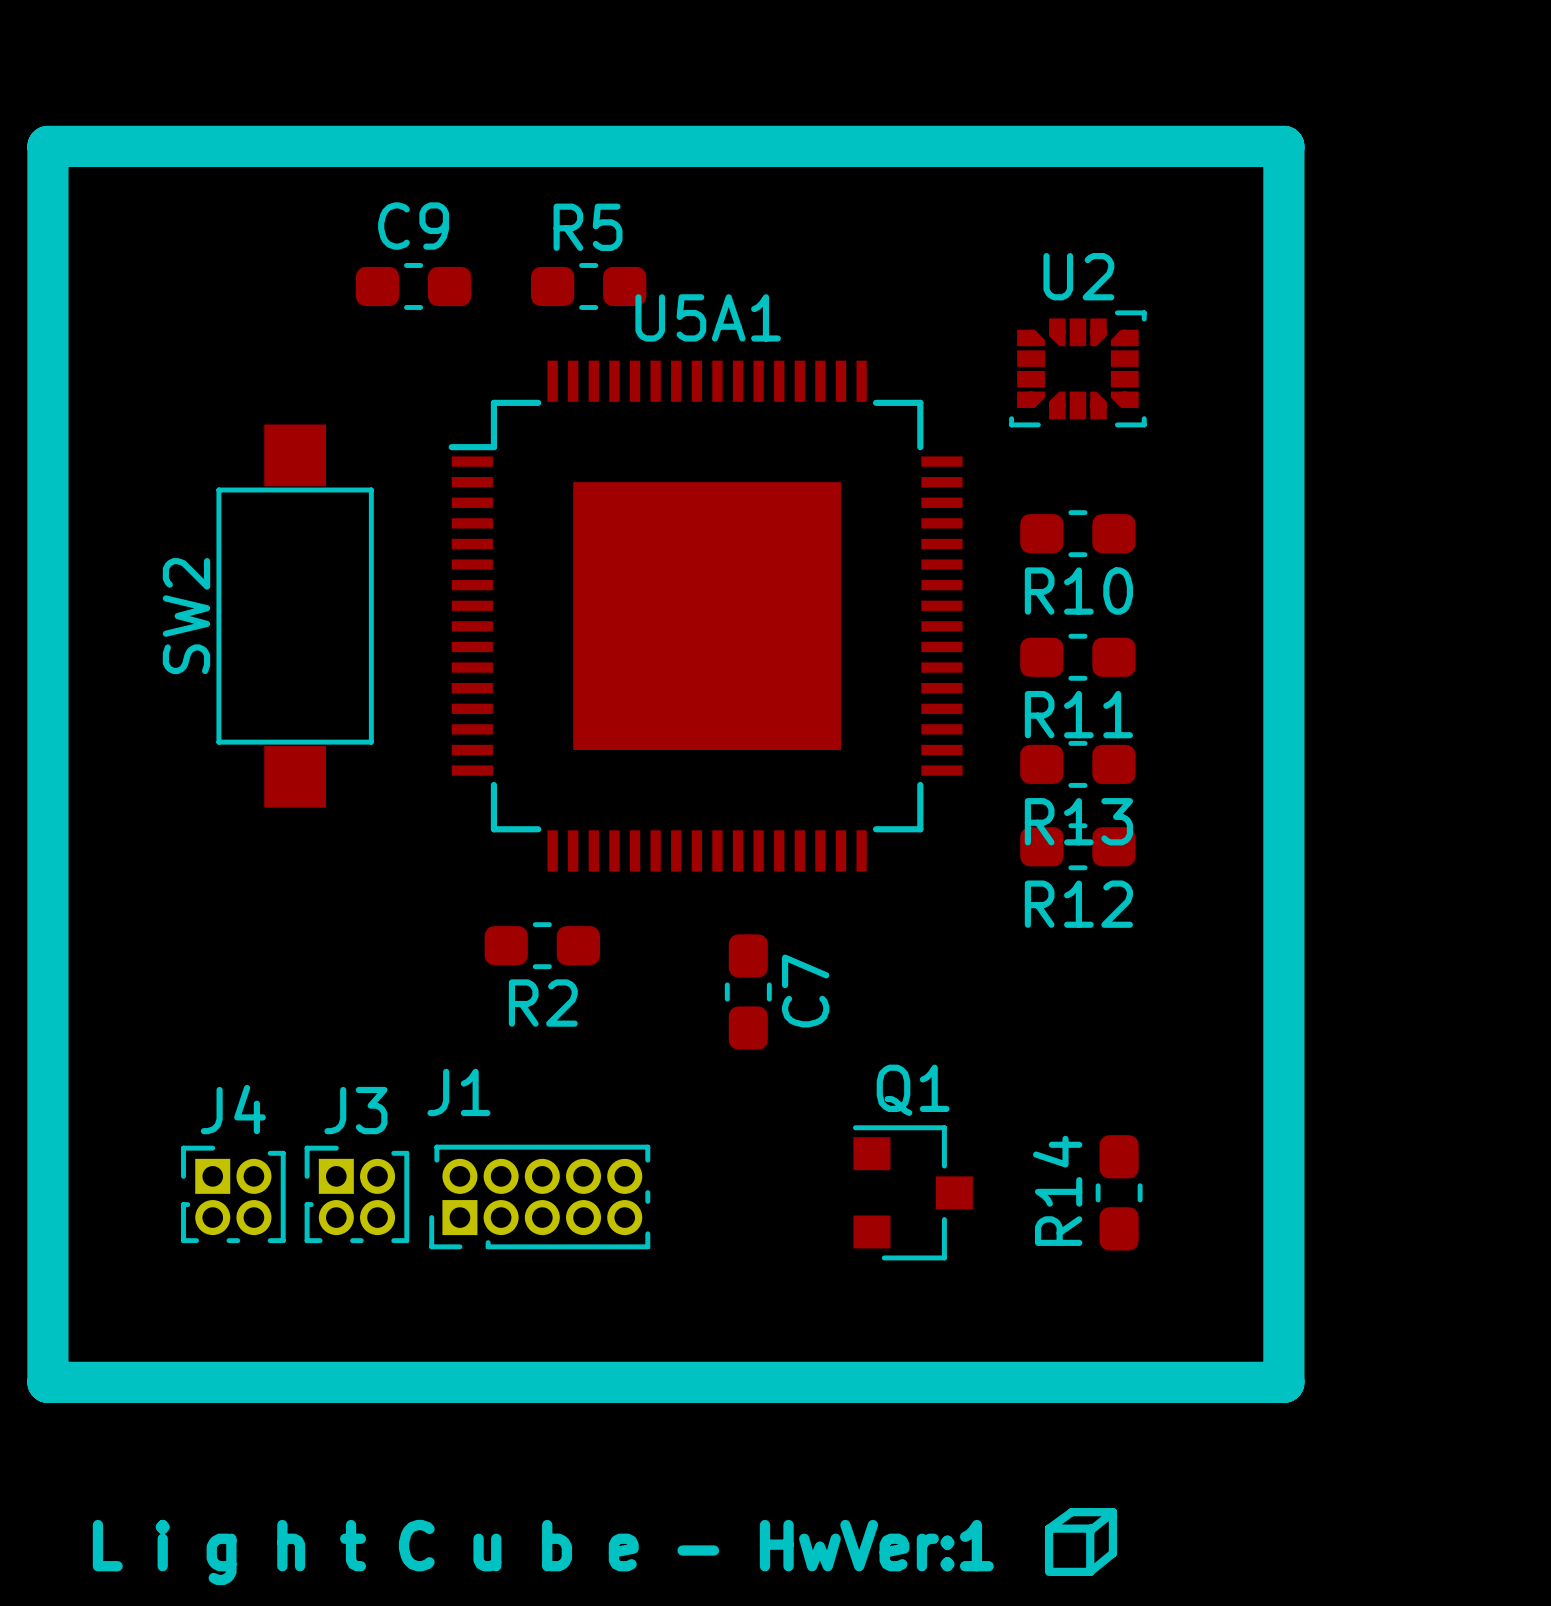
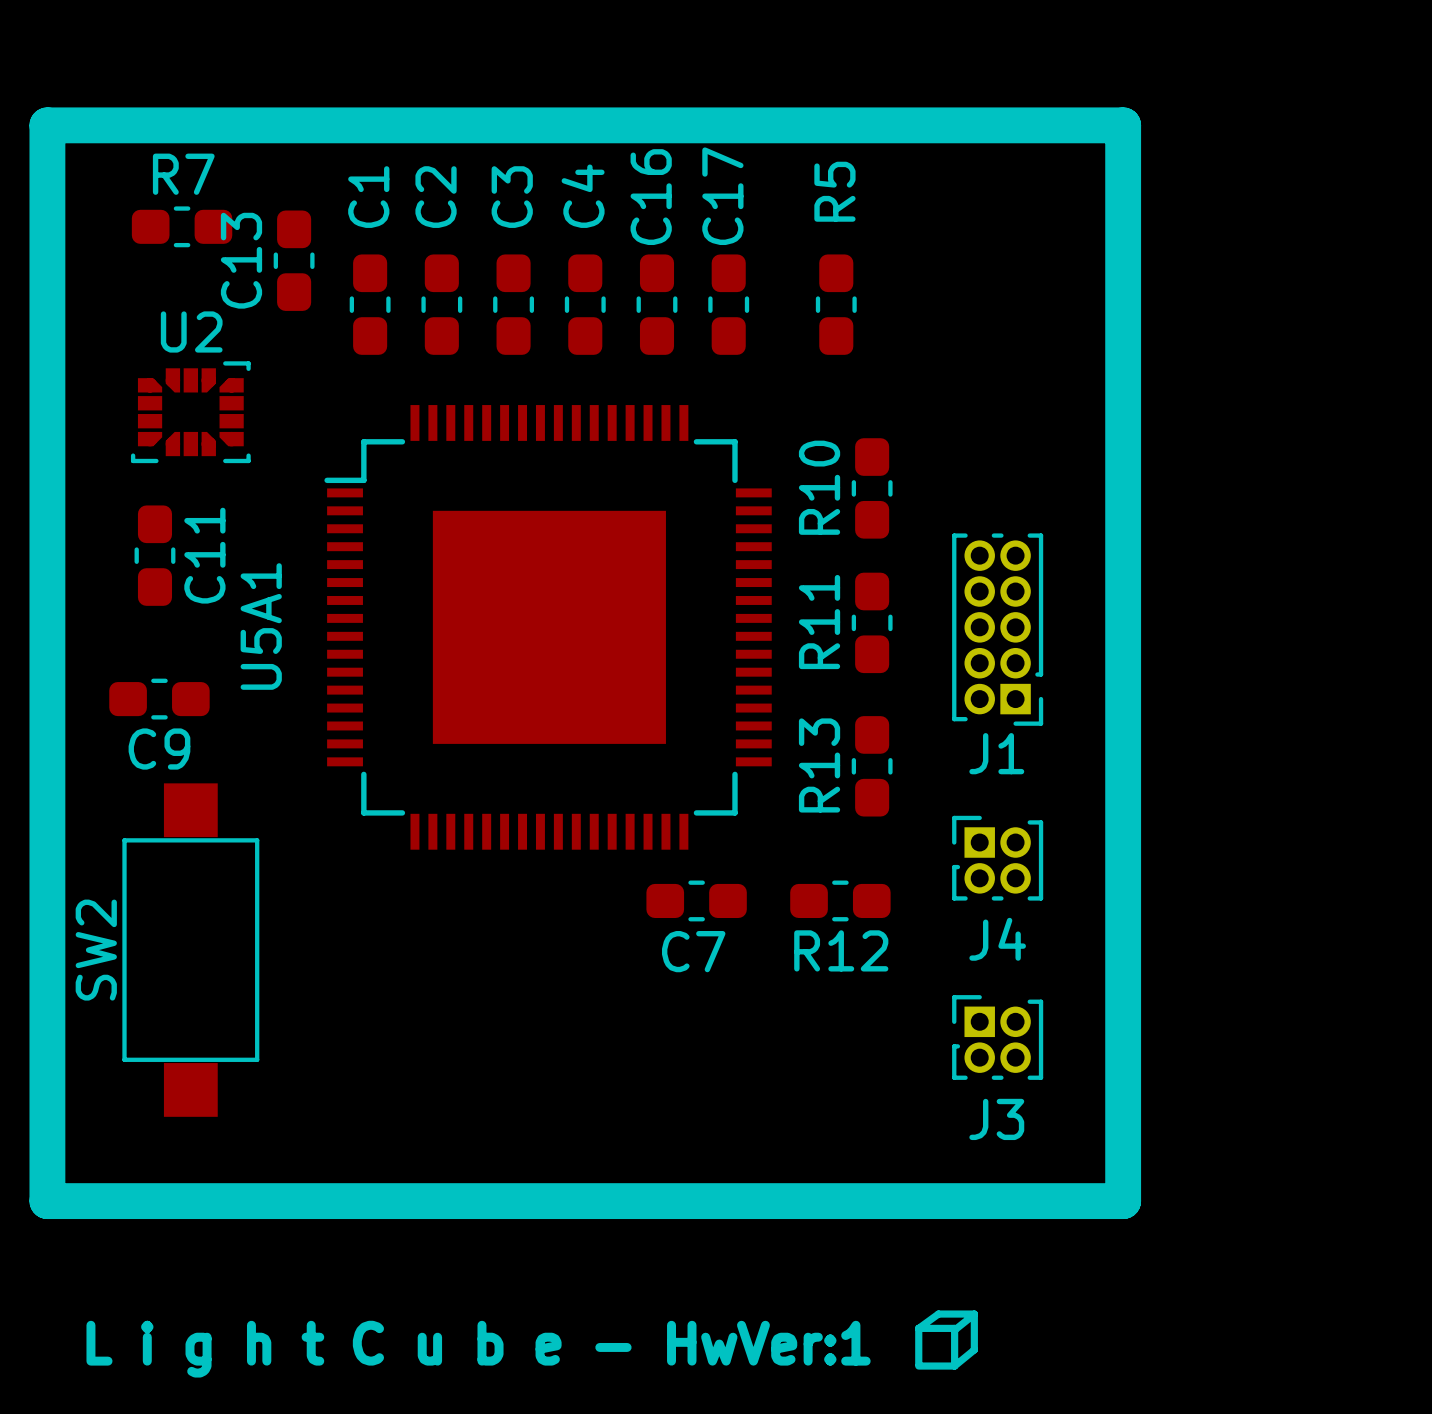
C9 name position: C9 (413, 226) -> C9 (159, 749)
R7: none -> (182, 226)
C9 position: (413, 286) -> (159, 699)
R5 rotation: 0° (588, 286) -> 90° clockwise (836, 304)
R5 position: (588, 286) -> (836, 304)
C13: none -> (294, 260)
U5A1 name rotation: 0° (708, 317) -> 90° counterclockwise (261, 626)
U5A1 name position: U5A1 (708, 317) -> U5A1 (261, 626)
C1: none -> (370, 304)
C2: none -> (441, 304)
C3: none -> (513, 304)
C4: none -> (585, 304)
C16: none -> (656, 304)
C17: none -> (728, 304)
U2 position: (1077, 368) -> (190, 412)
R10 rotation: 0° (1077, 533) -> 90° clockwise (872, 488)
R10 position: (1077, 533) -> (872, 488)
SW2 position: (295, 616) -> (190, 950)
U5A1 position: (705, 616) -> (548, 627)
C11: none -> (154, 555)
R11 rotation: 0° (1077, 657) -> 90° clockwise (872, 622)
R11 position: (1077, 657) -> (872, 622)
R13 rotation: 0° (1077, 764) -> 90° clockwise (872, 766)
R13 position: (1077, 764) -> (872, 766)
R12 position: (1077, 846) -> (840, 900)
R2: (542, 945) -> none
C7 rotation: 0° (748, 992) -> 90° clockwise (696, 900)
J1 name position: J1 (458, 1092) -> J1 (996, 753)
J4 name position: J4 (233, 1109) -> J4 (997, 939)
J3 name position: J3 (355, 1110) -> J3 (996, 1119)
Q1: (912, 1192) -> none
R14: (1119, 1192) -> none
J4 position: (233, 1194) -> (997, 858)
J3 position: (356, 1194) -> (997, 1037)
J1 rotation: 0° (539, 1196) -> 90° counterclockwise (997, 629)
J1 position: (539, 1196) -> (997, 629)

